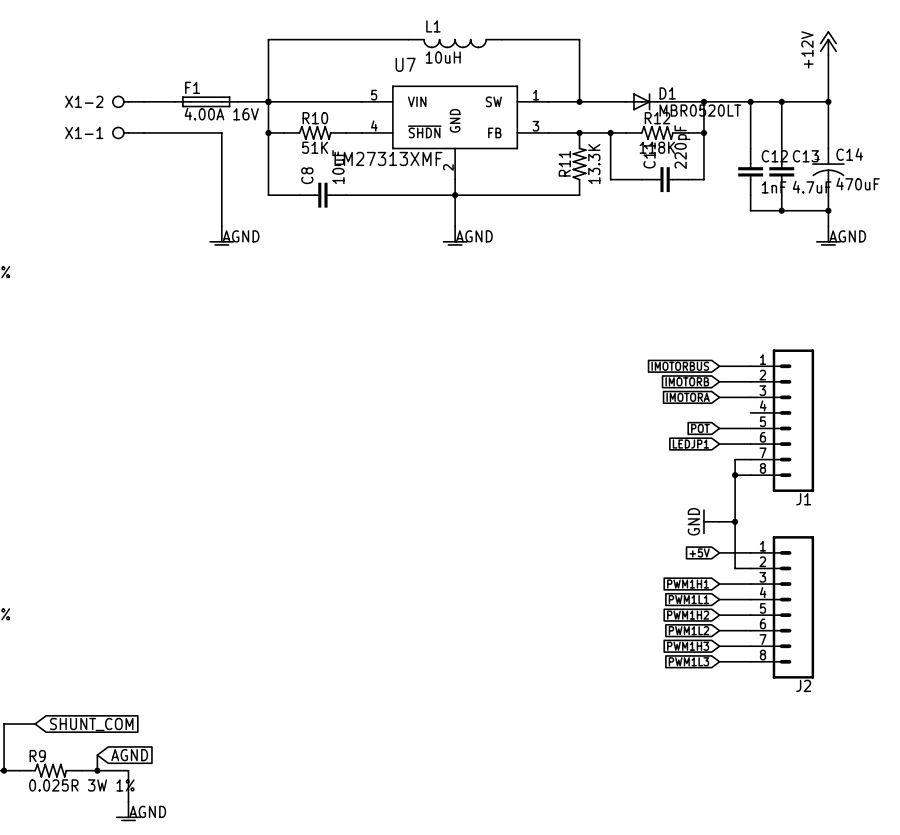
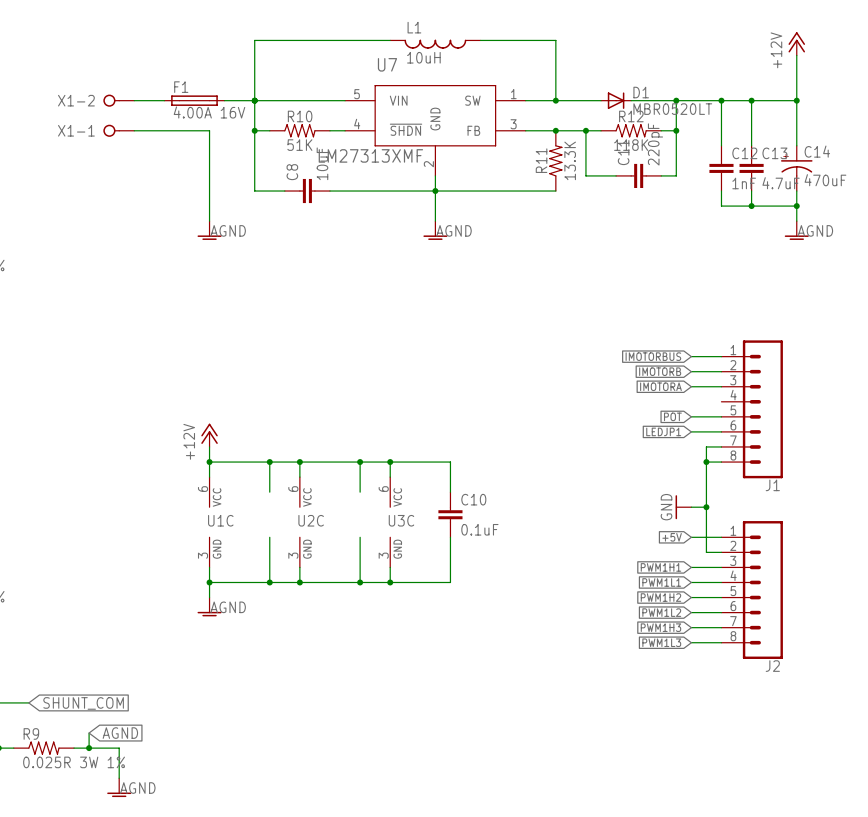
power symbol: none -> +12V (209, 435)
wire: none -> (209, 446) (209, 477)
wire: none -> (209, 462) (450, 462) (450, 492)
junction: none -> (209, 462)
wire: none -> (269, 462) (269, 492)
junction: none -> (269, 462)
wire: none -> (299, 462) (299, 477)
junction: none -> (299, 462)
wire: none -> (360, 462) (360, 492)
junction: none -> (360, 462)
wire: none -> (390, 462) (390, 477)
junction: none -> (390, 462)
C10: none -> 0.1uF (450, 514)
U1C: none -> (209, 522)
U2C: none -> (299, 522)
U3C: none -> (390, 522)
wire: none -> (269, 537) (269, 582)
wire: none -> (360, 537) (360, 582)
wire: none -> (450, 537) (450, 582) (209, 582)
wire: none -> (209, 567) (209, 597)
wire: none -> (299, 567) (299, 582)
wire: none -> (390, 567) (390, 582)
junction: none -> (209, 582)
junction: none -> (269, 582)
junction: none -> (299, 582)
junction: none -> (360, 582)
junction: none -> (390, 582)
power symbol: none -> AGND (209, 606)

